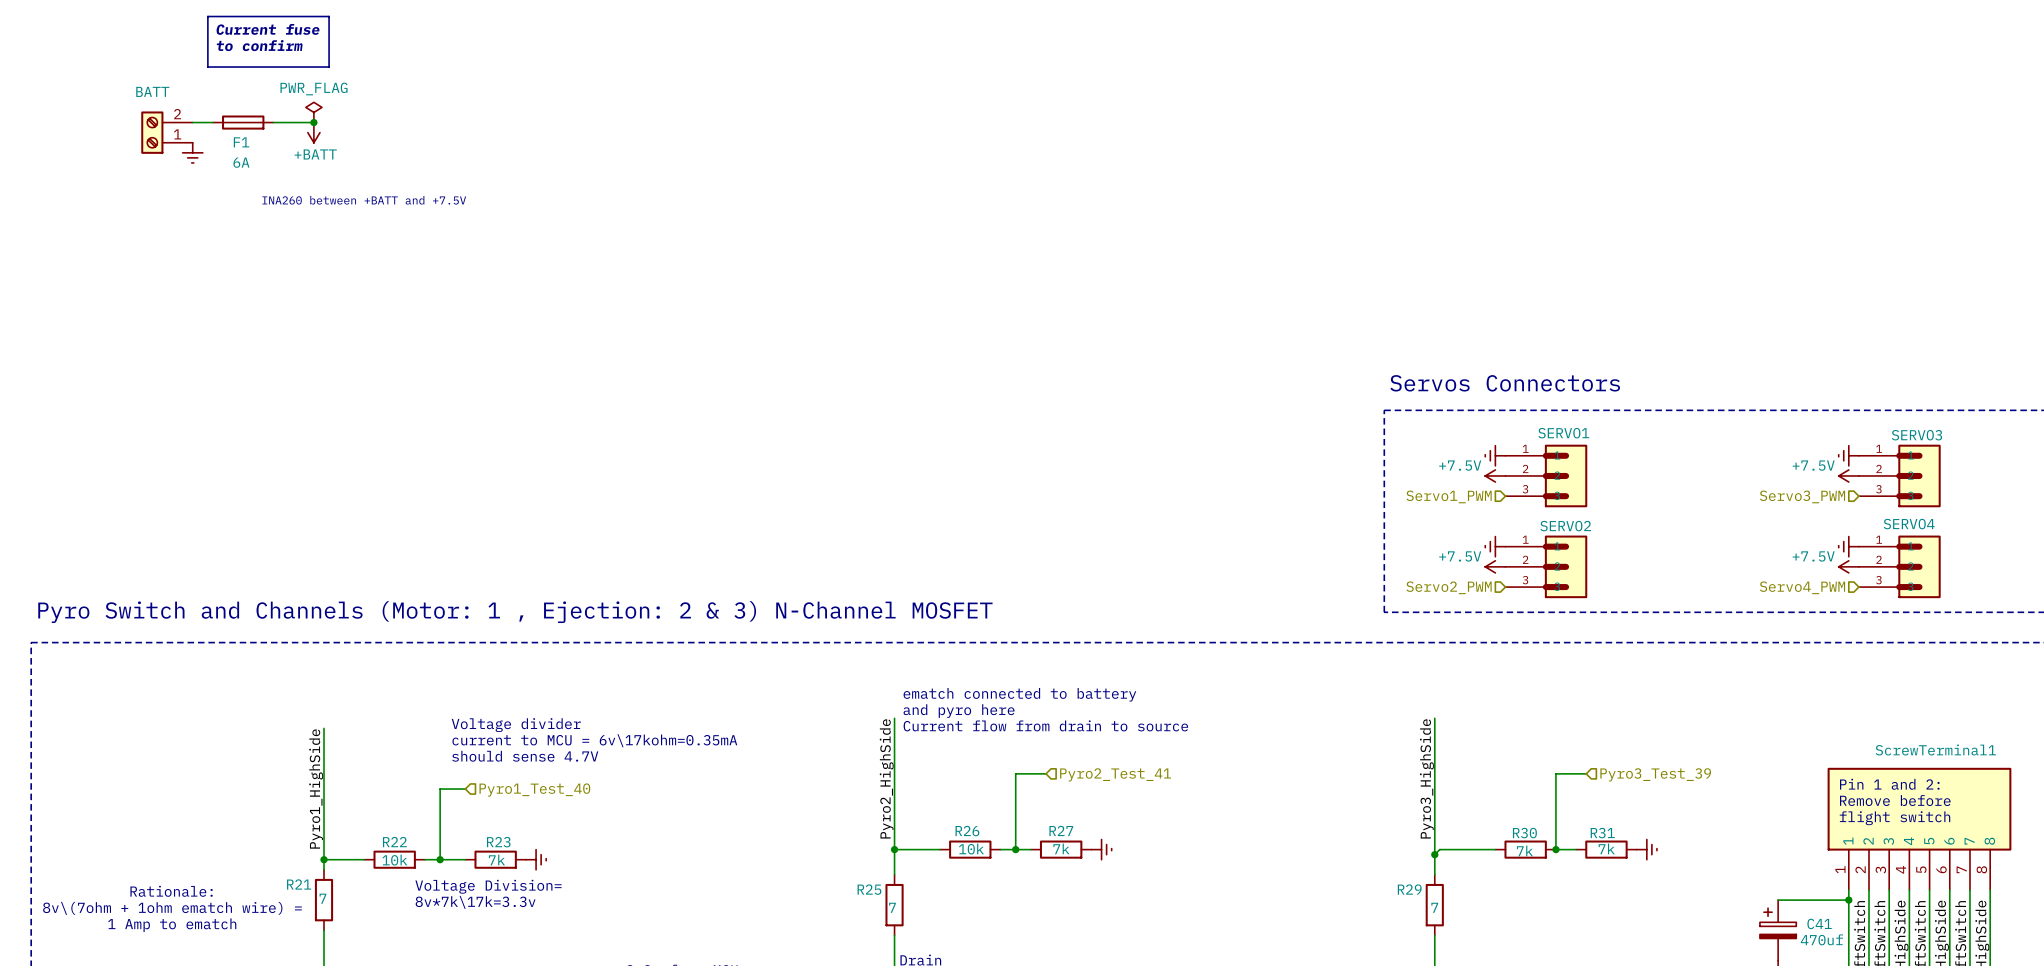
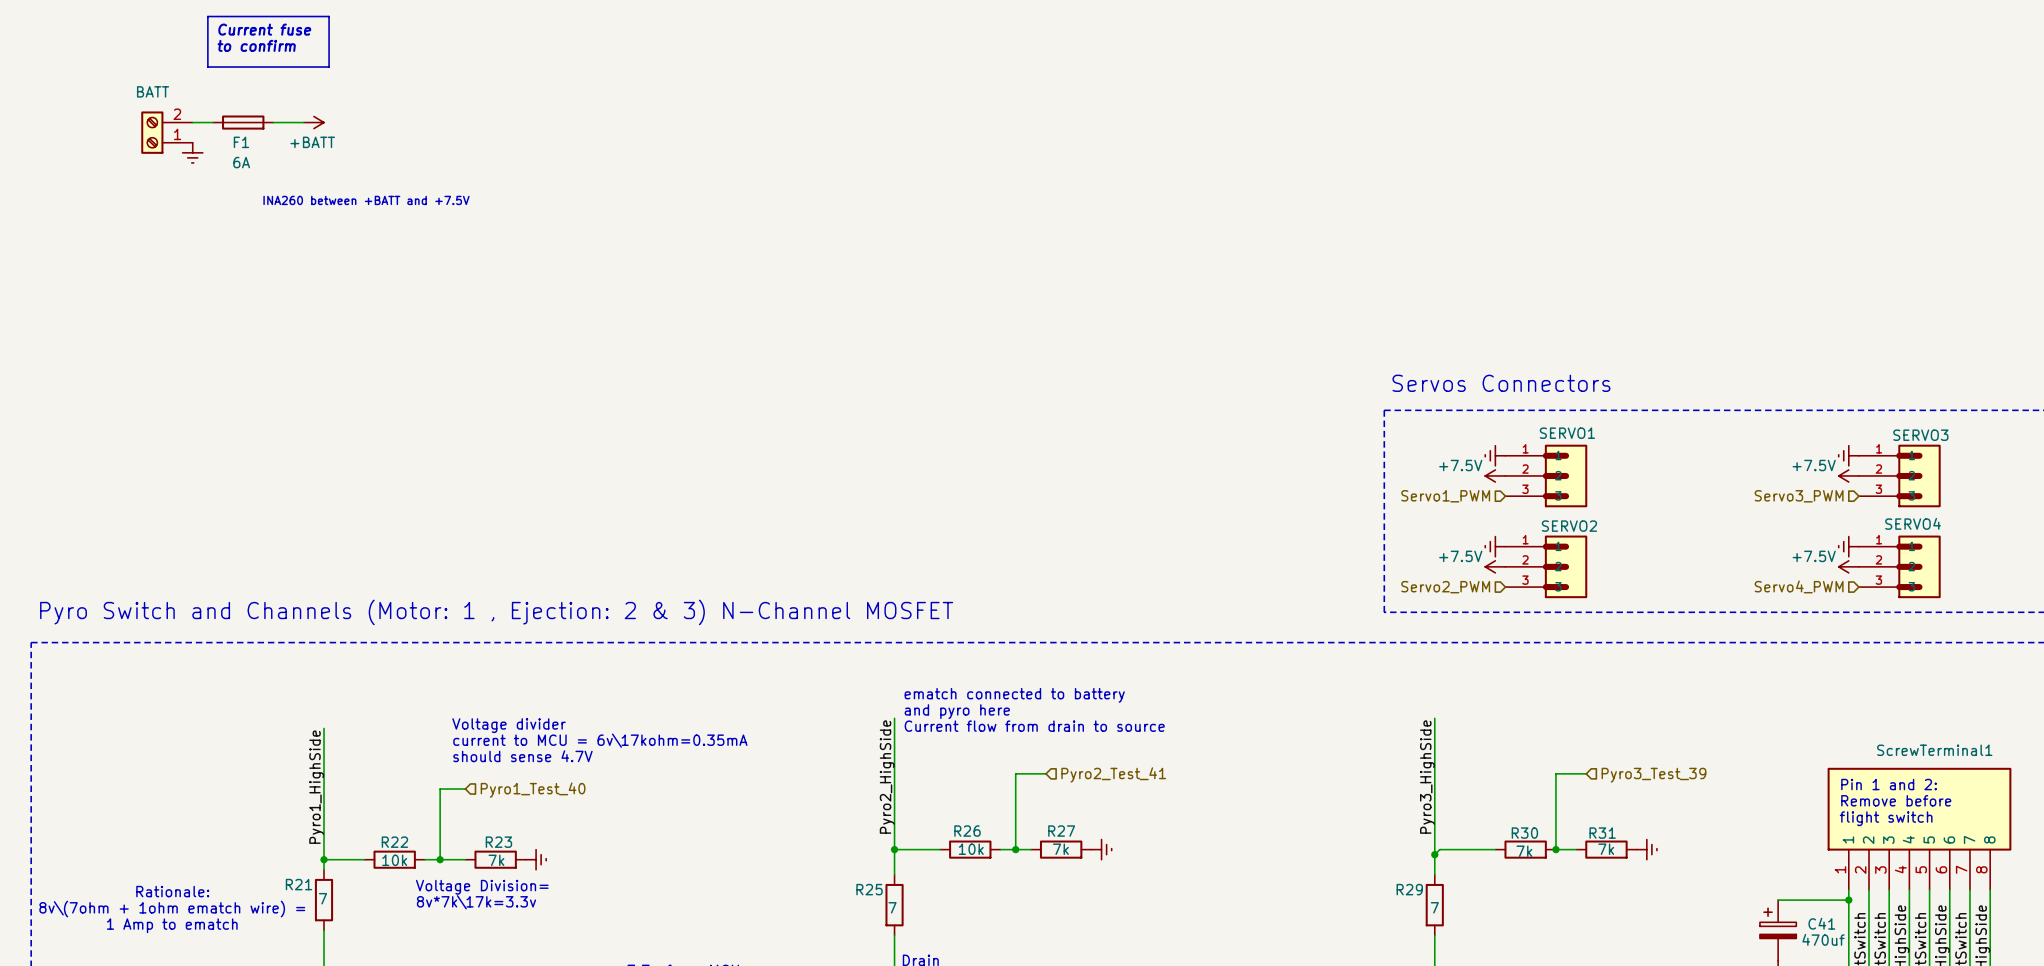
power symbol: PWR_FLAG (313, 112) -> none
junction: (313, 122) -> none
power symbol rotation: 0° (313, 132) -> 90° counterclockwise (313, 122)

